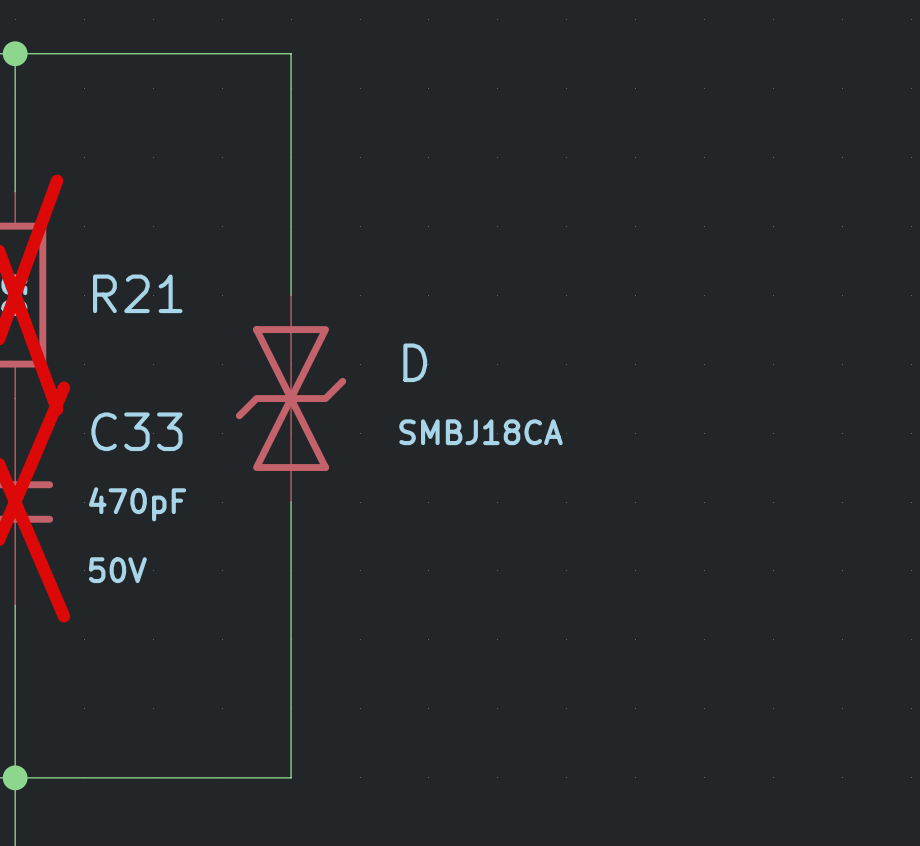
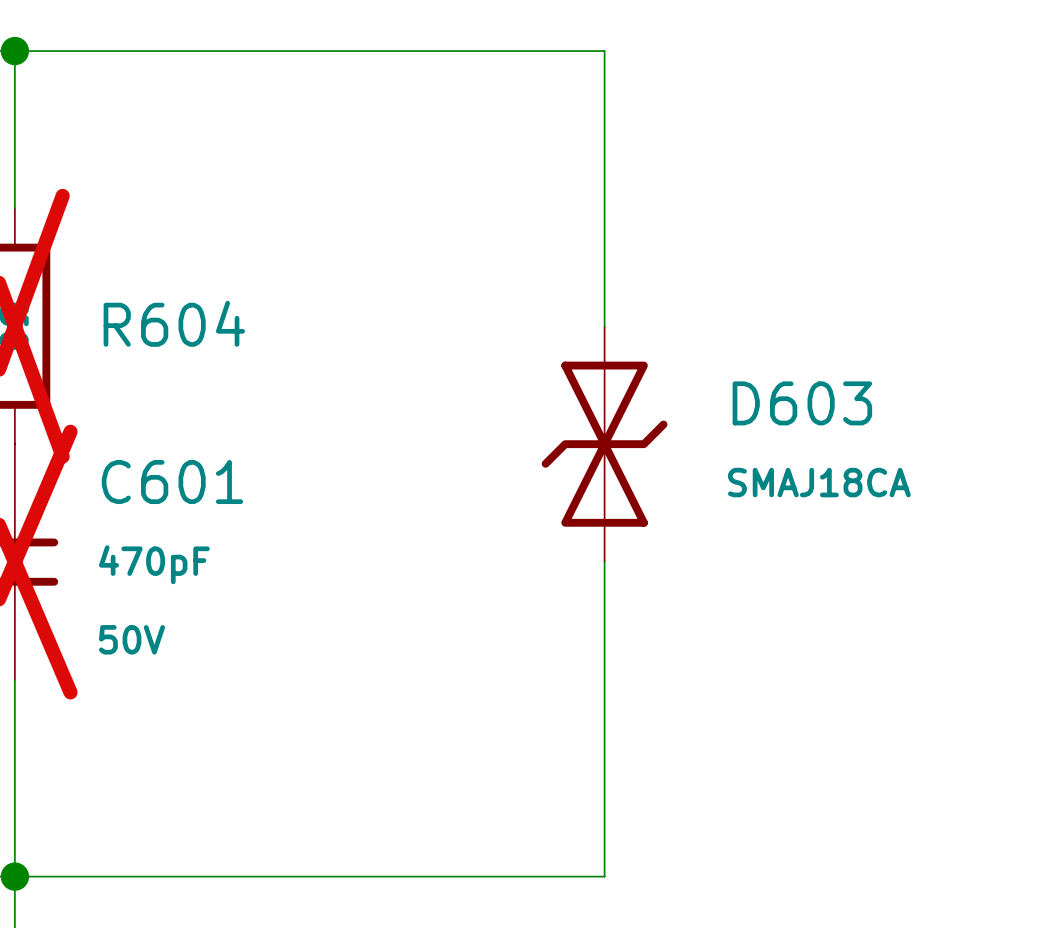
wire: (291, 53) (291, 295) -> (329, 51) (604, 51) (604, 326)
R21 name: R21 (137, 293) -> R604 (174, 323)
D: SMBJ18CA (291, 398) -> none
D603: none -> SMAJ18CA (604, 444)
C33 name: C33 (136, 431) -> C601 (172, 482)
wire: (291, 502) (291, 777) -> (604, 562) (604, 876) (329, 876)

